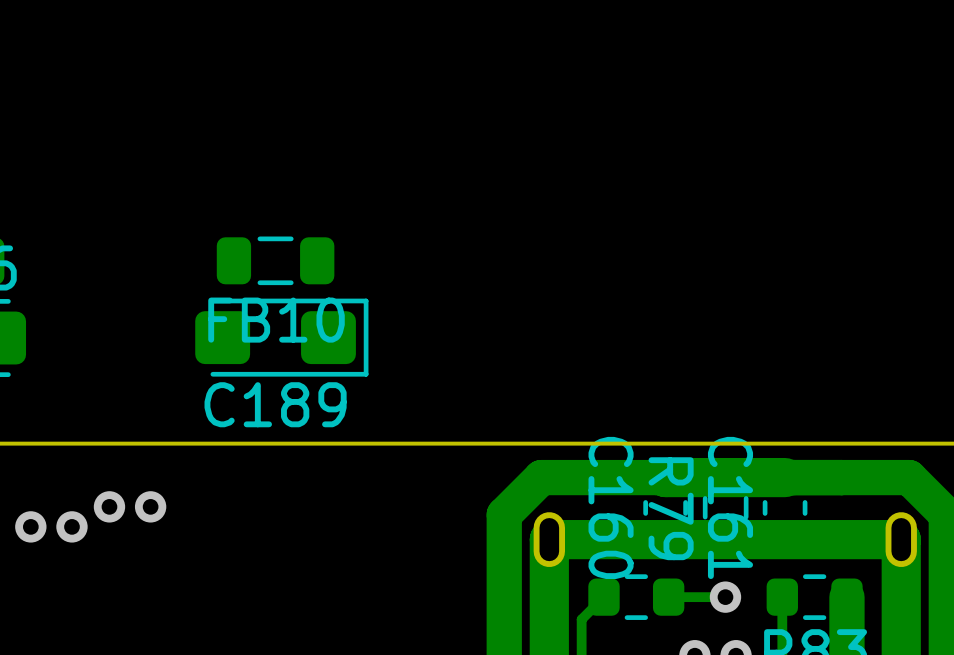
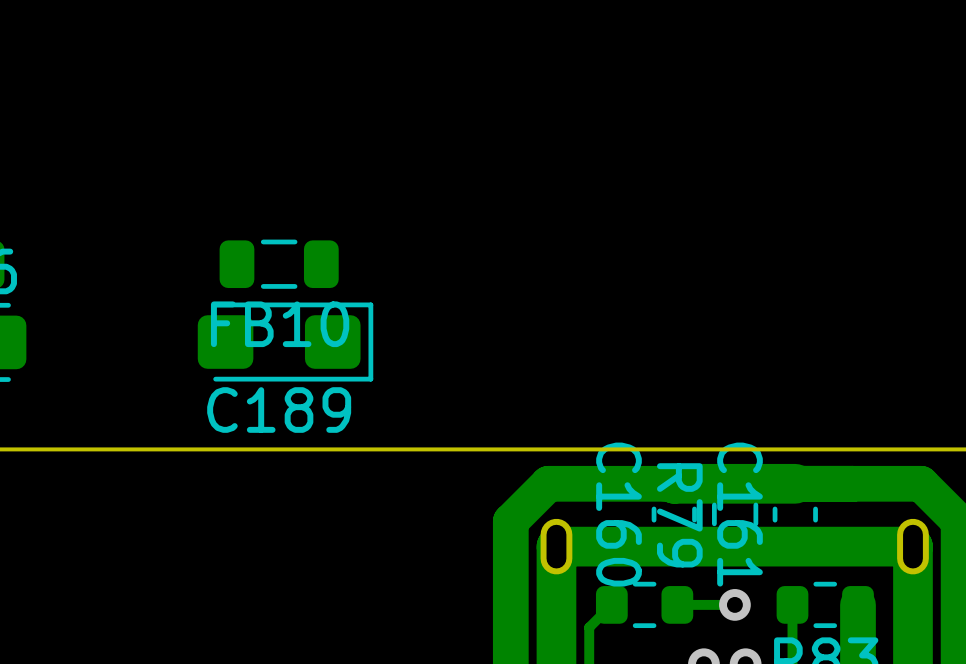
via: (109, 506) -> none
via: (150, 506) -> none
via: (30, 526) -> none
via: (71, 526) -> none

